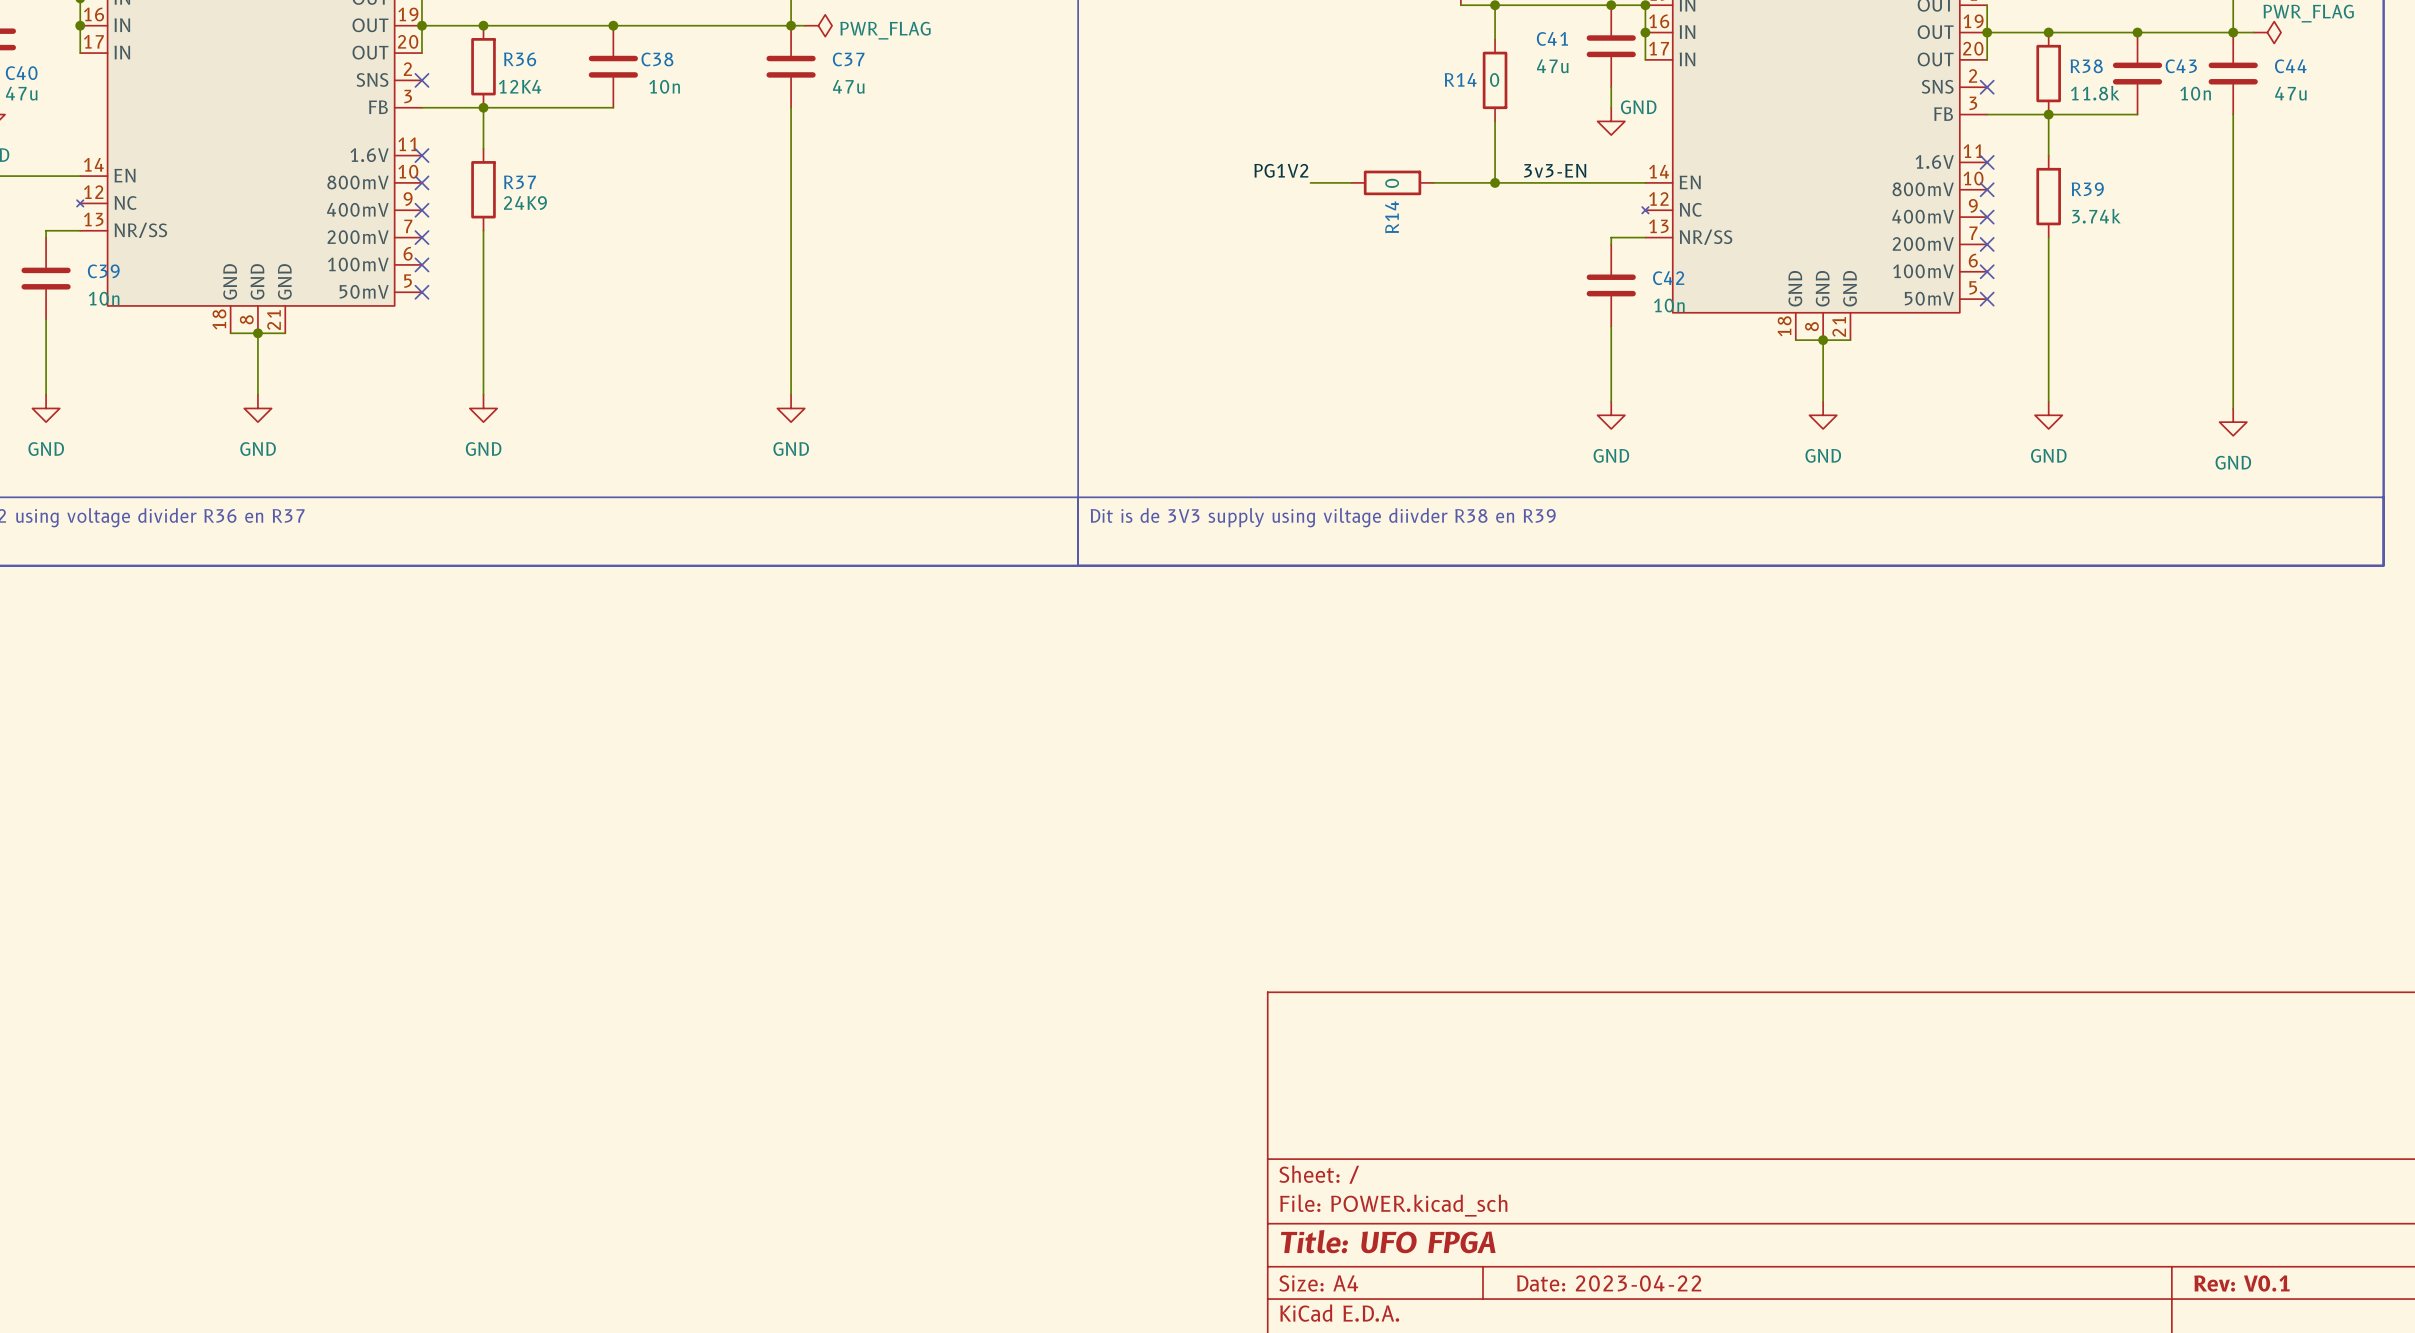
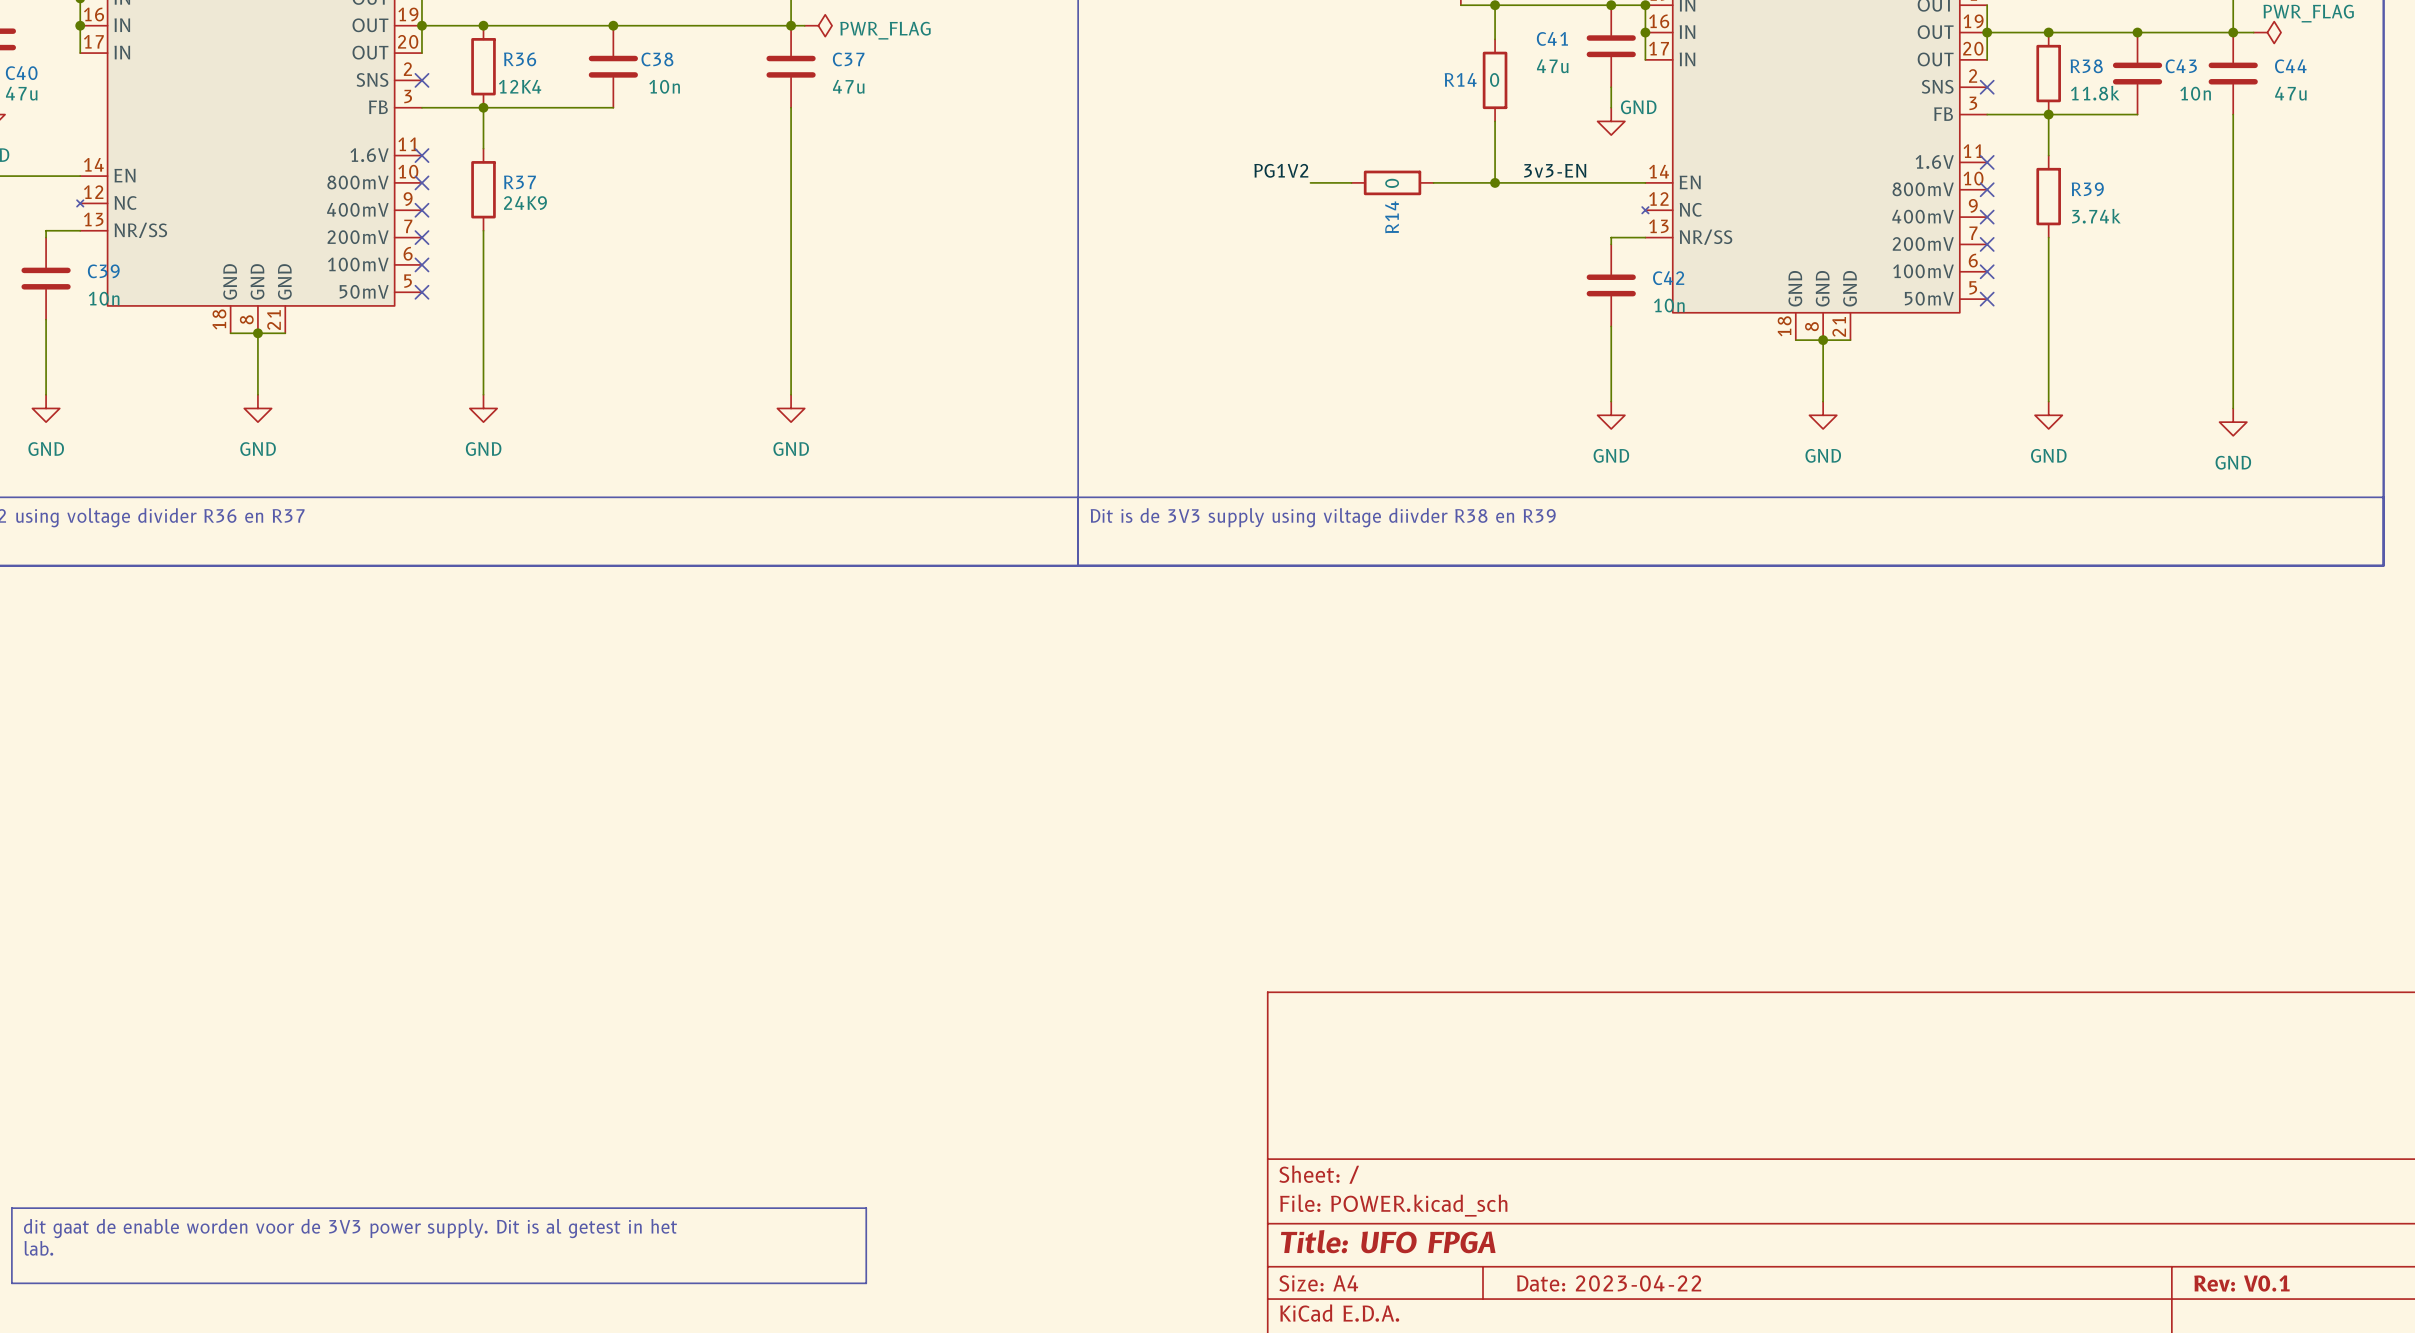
line: none -> (11, 1208) (866, 1208) (866, 1283) (11, 1283) (11, 1208)
text: none -> dit gaat de enable worden voor de 3V3 power supply. Dit is al getest in het (350, 1228)
text: none -> lab. (38, 1248)

